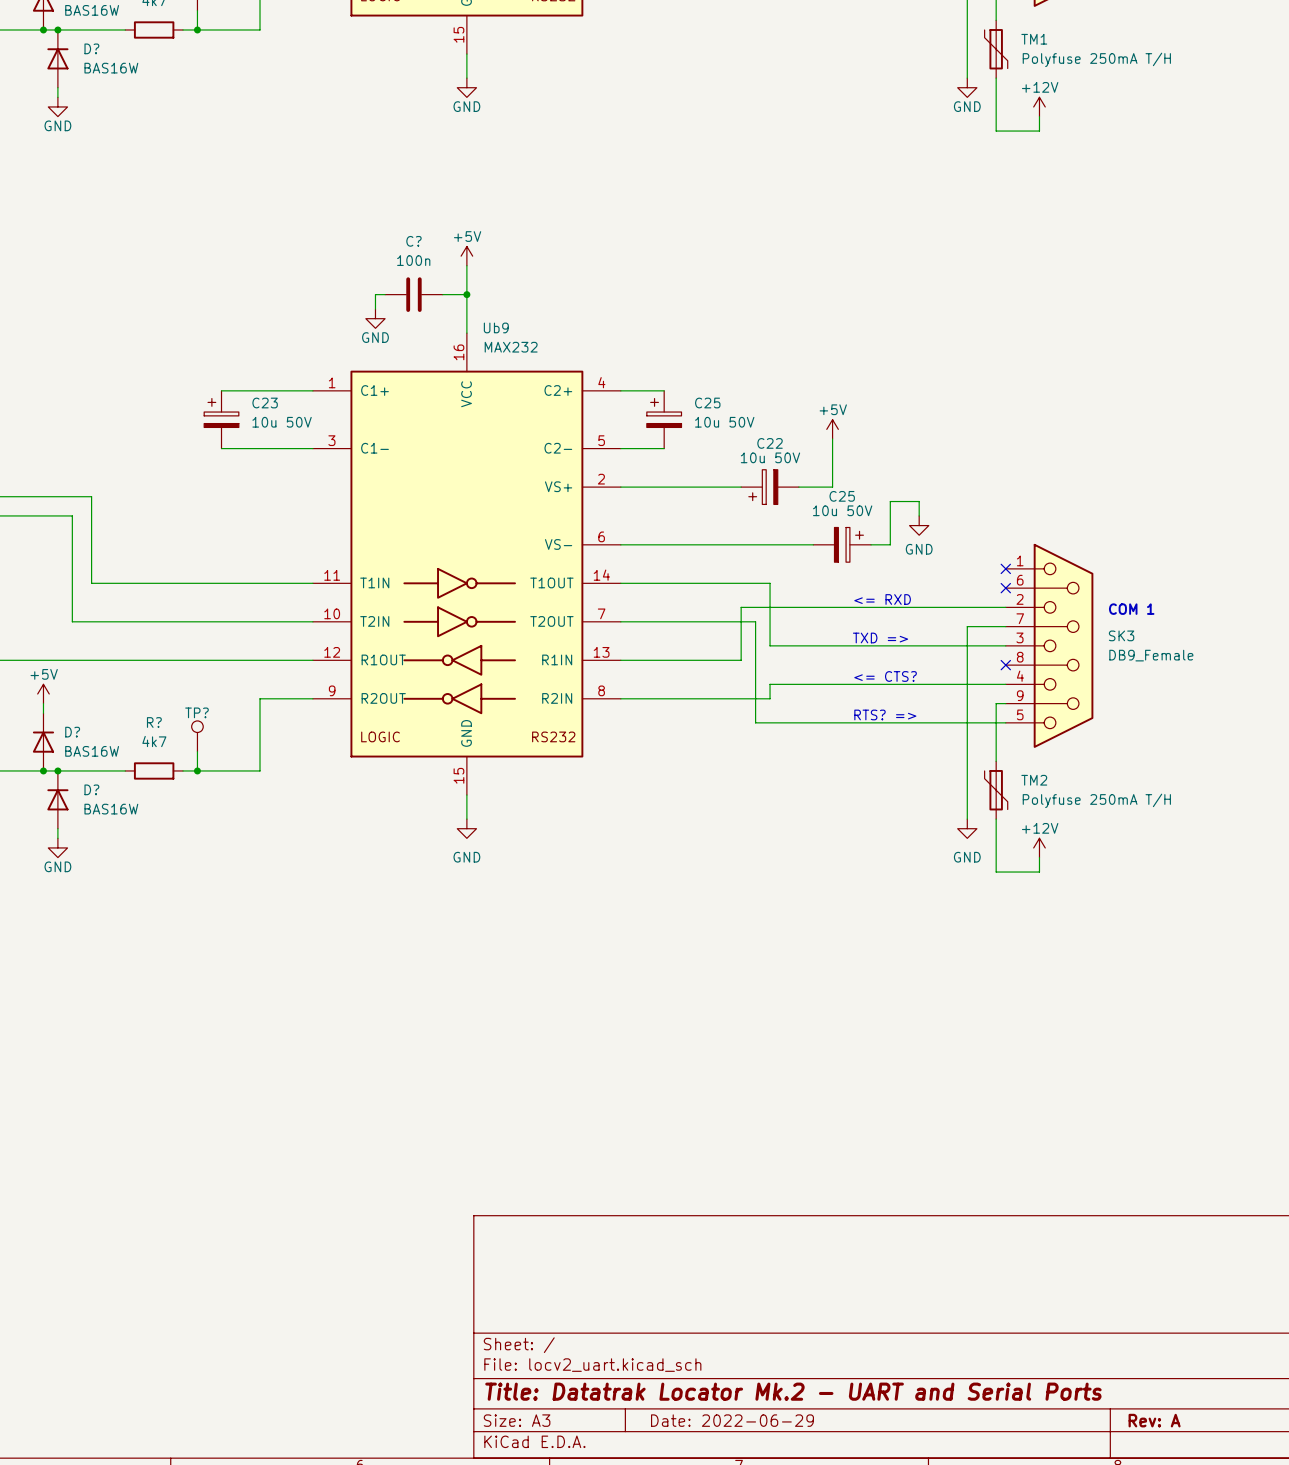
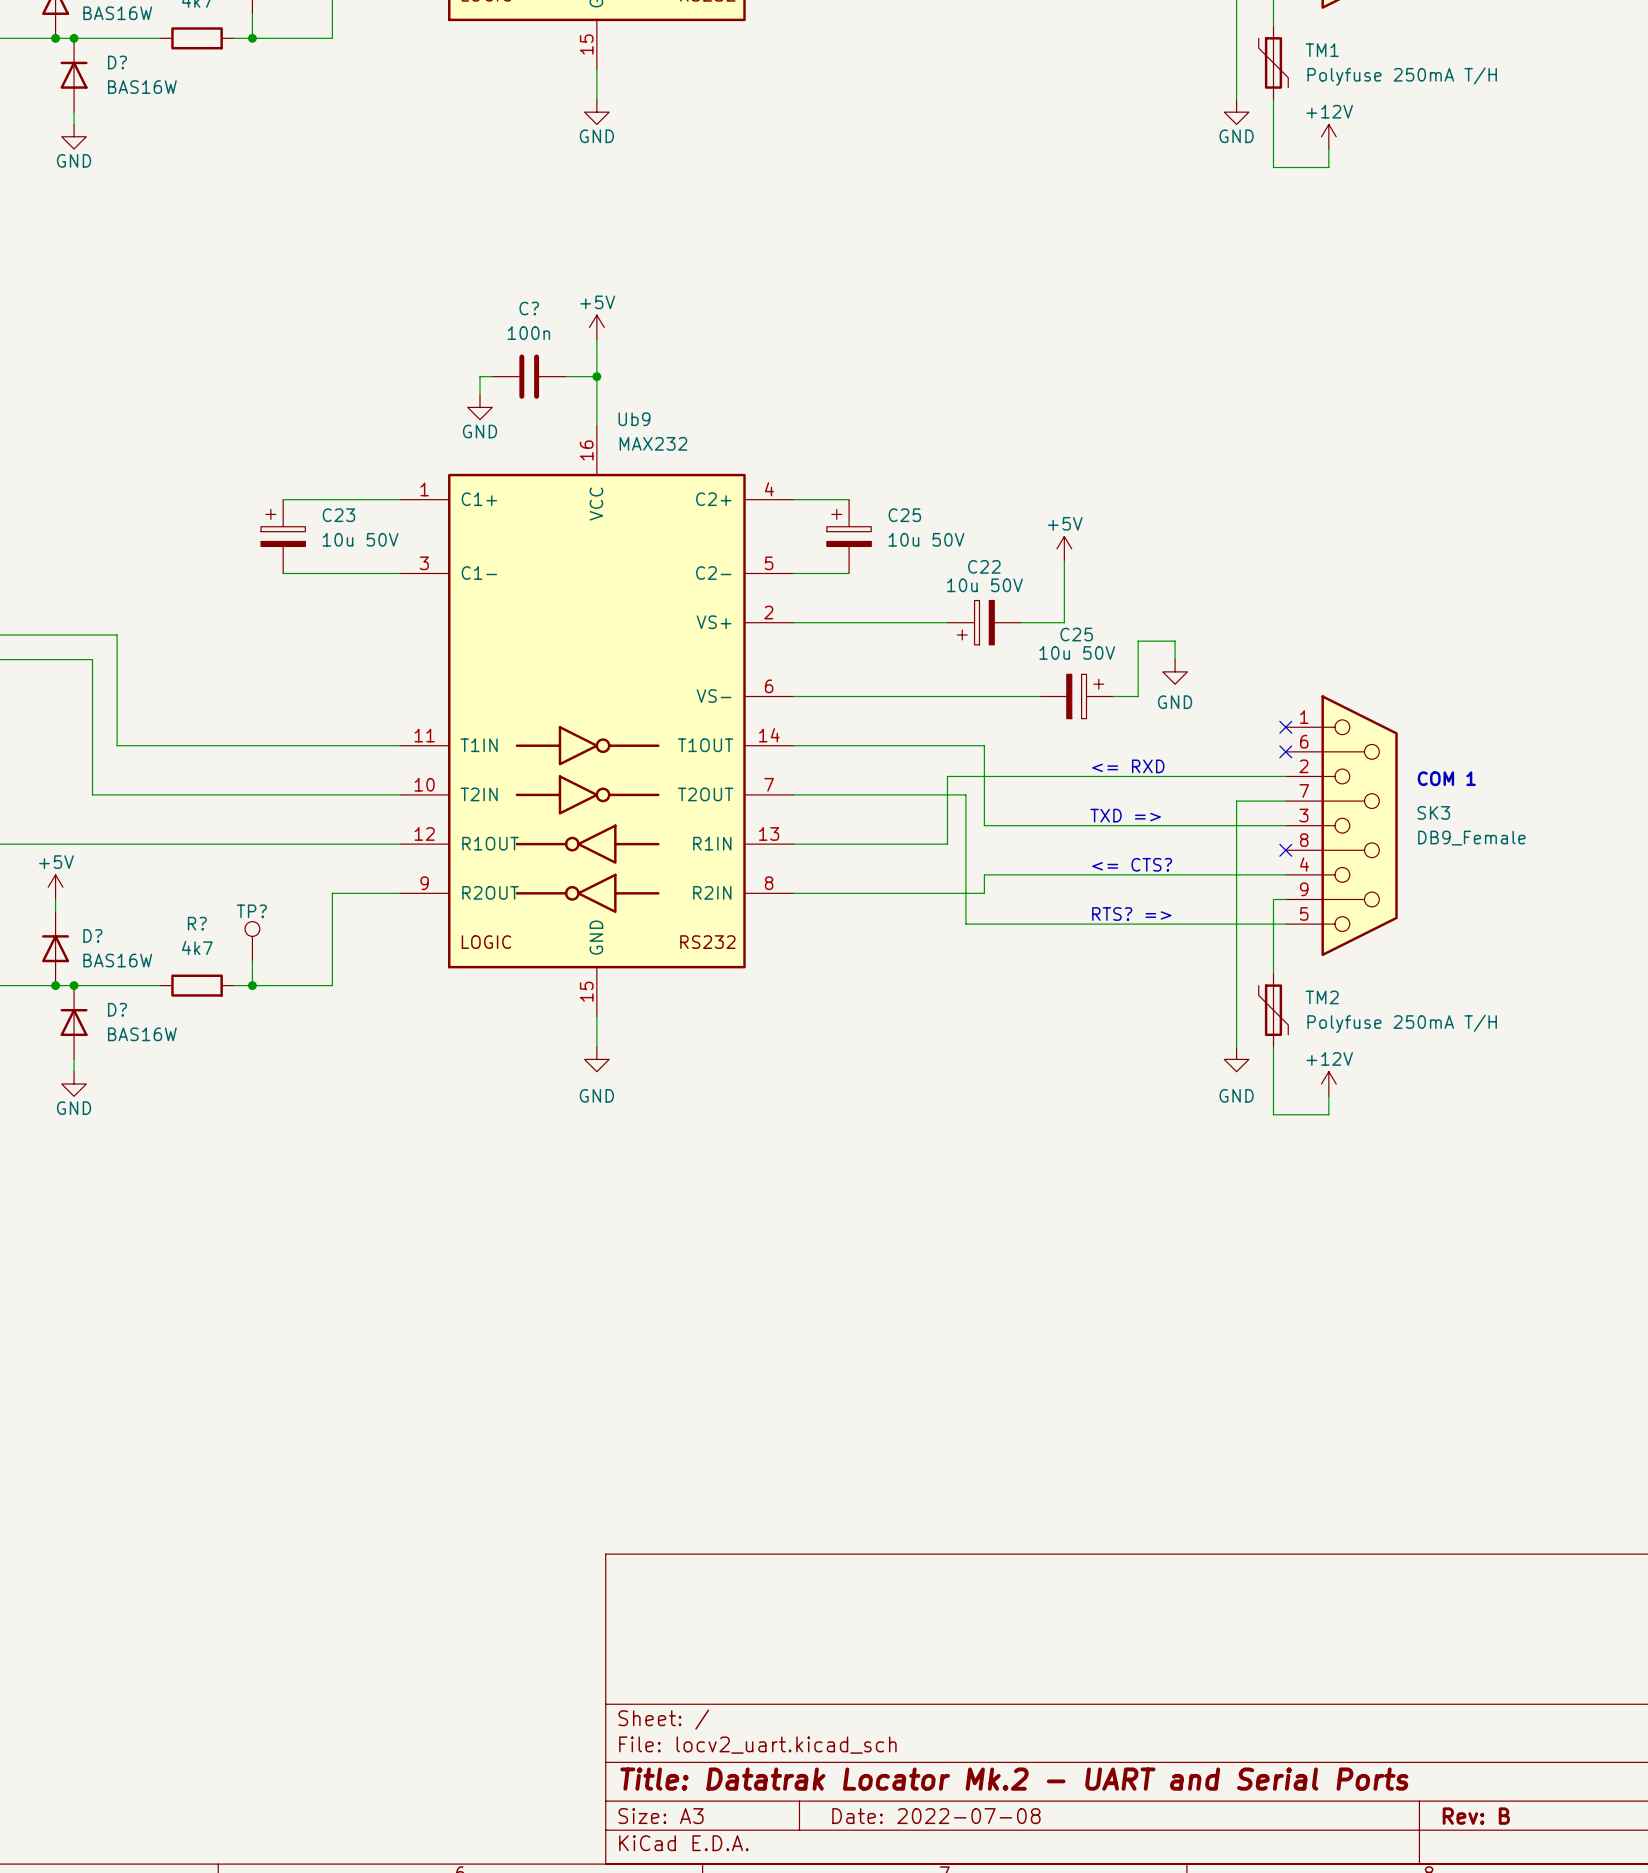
title block: Date: 2022-06-29 (732, 1420) -> Date: 2022-07-08 (936, 1816)
title block: Rev: A (1154, 1420) -> Rev: B (1476, 1816)

